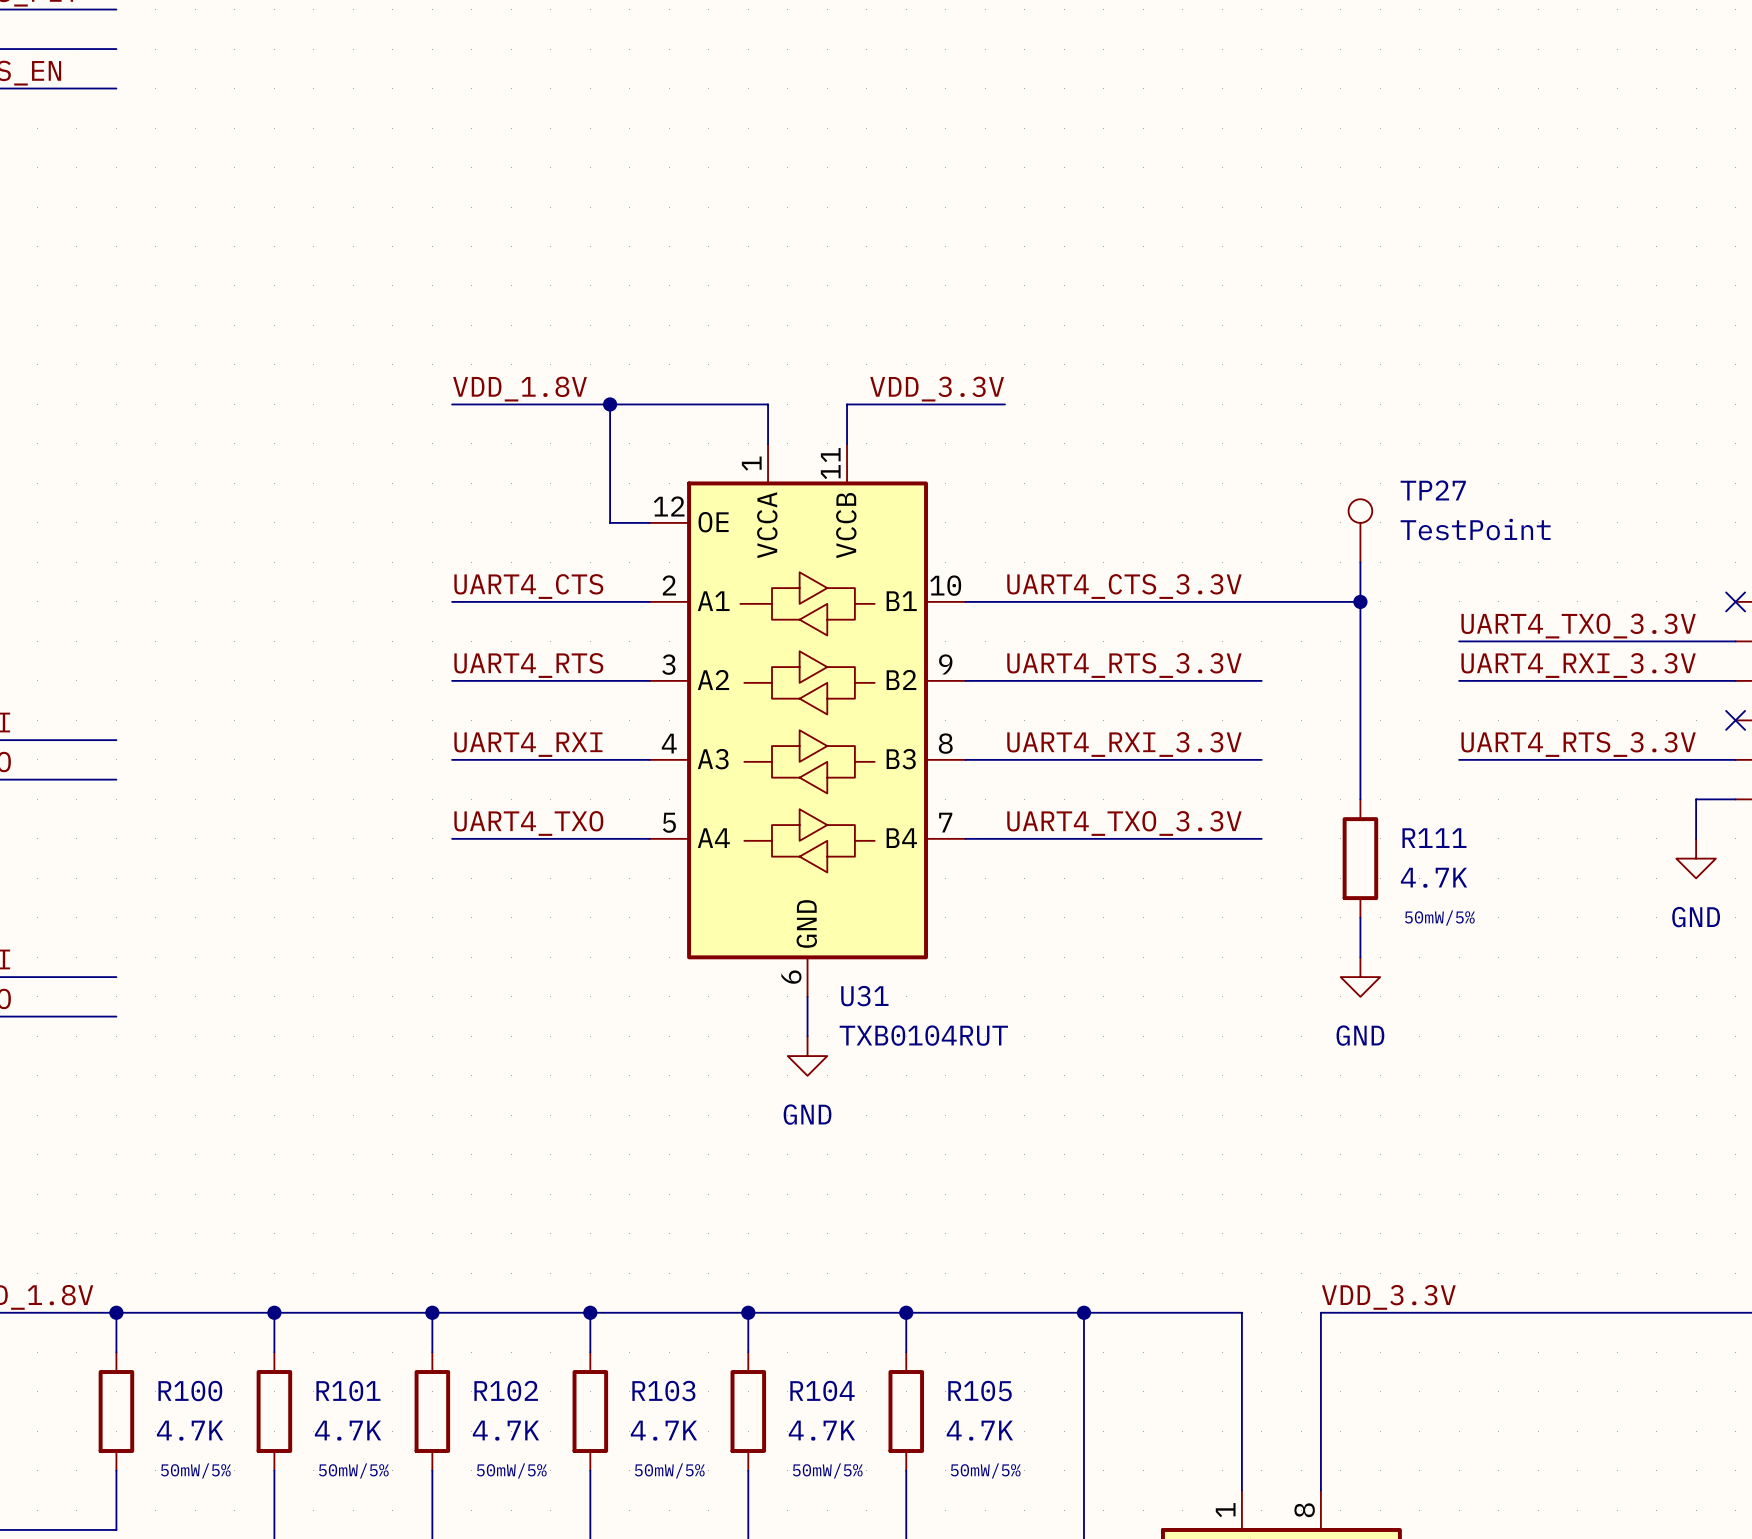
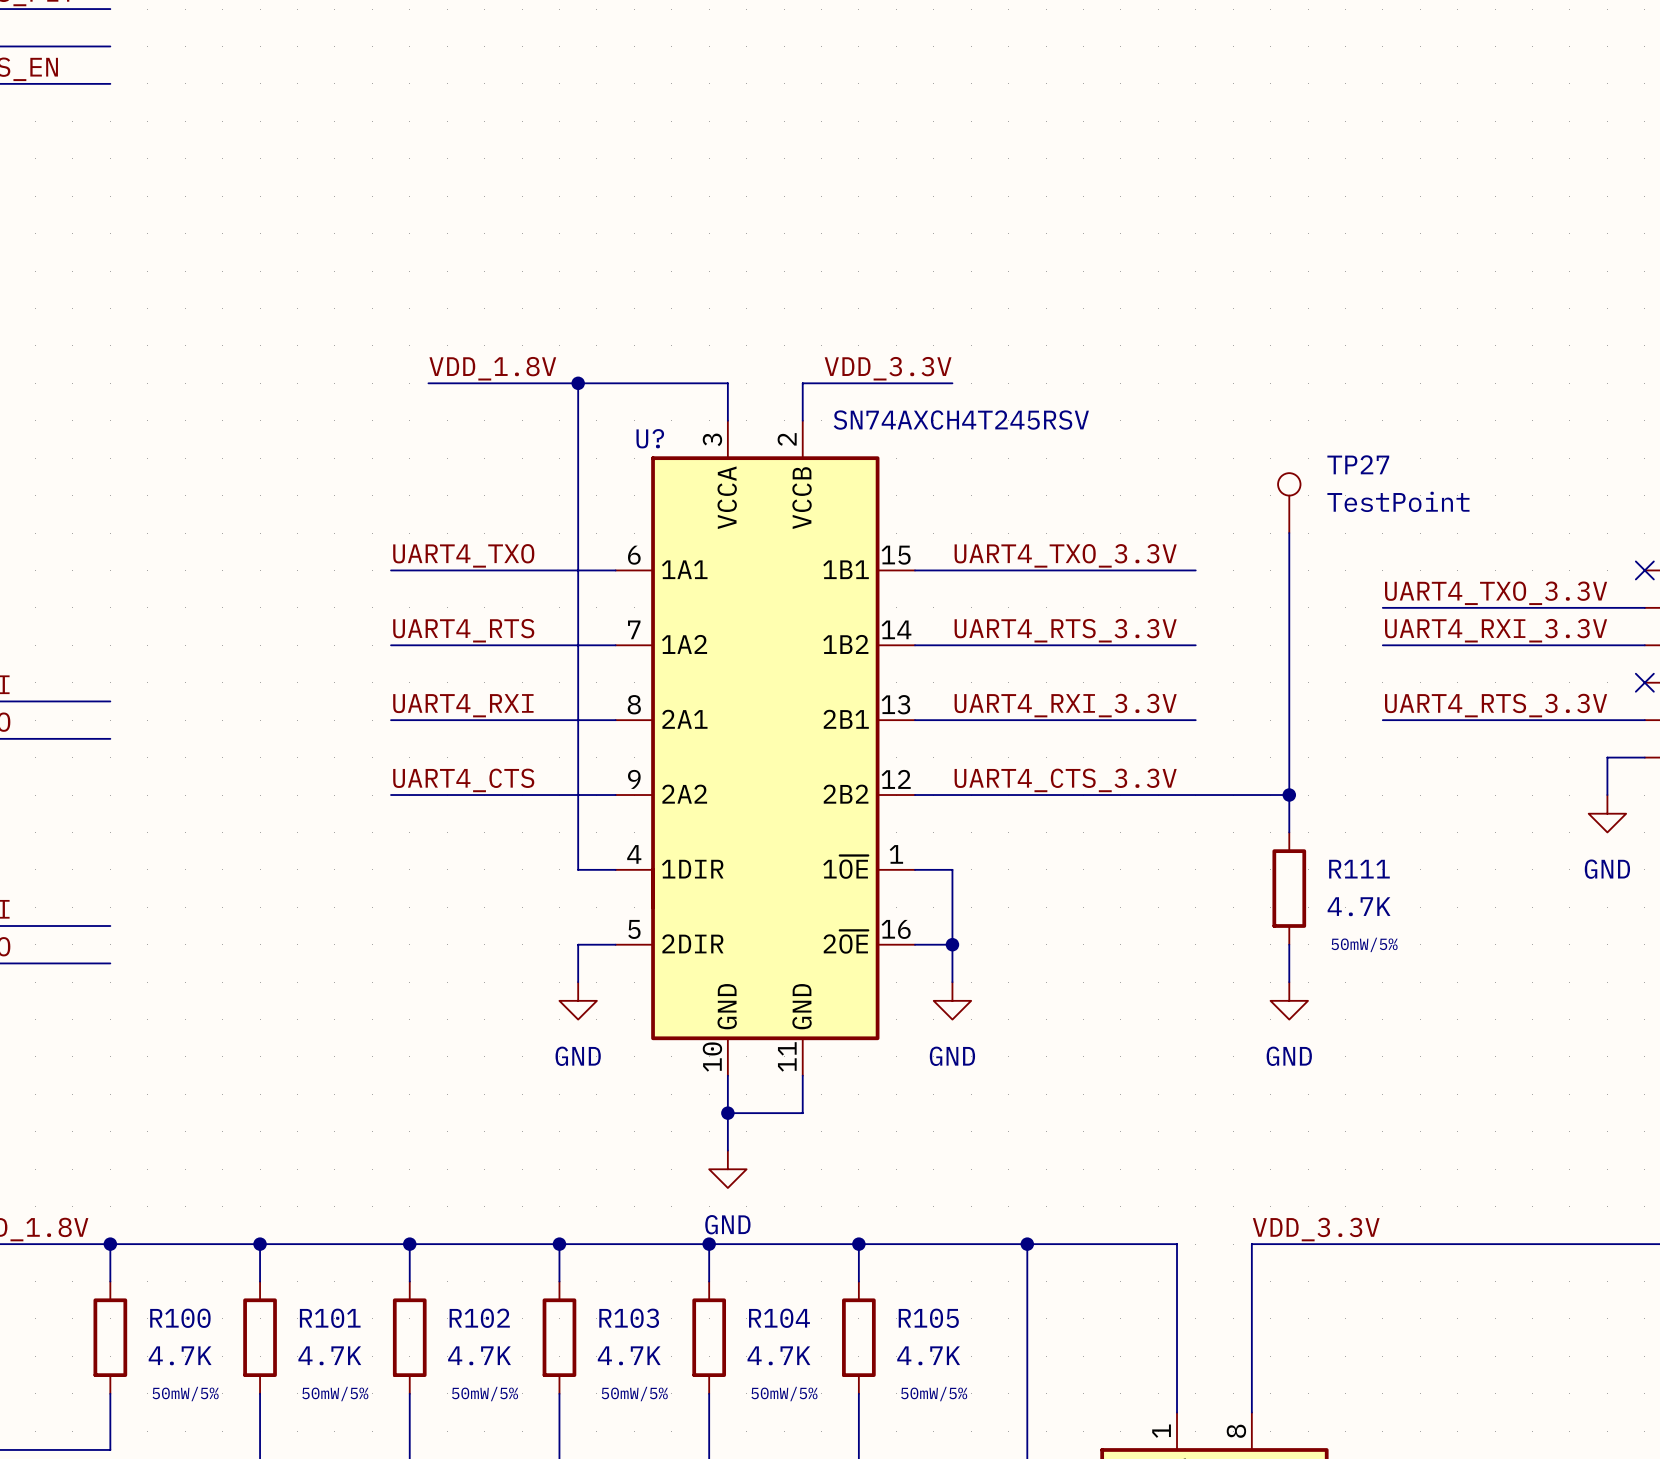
wire: (610, 522) (649, 522) -> (578, 495) (578, 869) (615, 869)
label position: UART4_CTS (528, 586) -> UART4_CTS (463, 780)
label: UART4_CTS_3.3V (1124, 586) -> UART4_TXO_3.3V (1065, 555)
wire: none -> (391, 570) (428, 570)
wire: (1261, 601) (1360, 601) -> (1195, 795) (1289, 795)
junction: (1360, 601) -> none
label position: UART4_RTS (528, 665) -> UART4_RTS (463, 630)
wire: none -> (391, 645) (428, 645)
U31: TXB0104RUT (807, 720) -> none
label position: UART4_RXI (528, 744) -> UART4_RXI (463, 705)
wire: none -> (391, 720) (428, 720)
U?: none -> SN74AXCH4T245RSV (765, 748)
wire: none -> (1289, 757) (1289, 832)
label position: UART4_TXO (528, 823) -> UART4_TXO (463, 555)
label: UART4_TXO_3.3V (1124, 823) -> UART4_CTS_3.3V (1065, 780)
wire: none -> (391, 795) (428, 795)
junction: none -> (1289, 795)
R111 position: (1360, 858) -> (1289, 888)
wire: none -> (915, 869) (952, 869) (952, 982)
wire: (1360, 917) (1360, 957) -> (1289, 944) (1289, 982)
power symbol position: GND (1360, 977) -> GND (1289, 1000)
wire: none -> (615, 944) (578, 944) (578, 982)
wire: none -> (915, 944) (952, 944)
junction: none -> (952, 944)
power symbol: none -> GND (578, 1000)
power symbol: GND (807, 1056) -> none
power symbol: none -> GND (952, 1000)
wire: none -> (727, 1075) (727, 1150)
wire: none -> (802, 1075) (802, 1113) (727, 1113)
junction: none -> (727, 1113)
power symbol: none -> GND (727, 1169)

